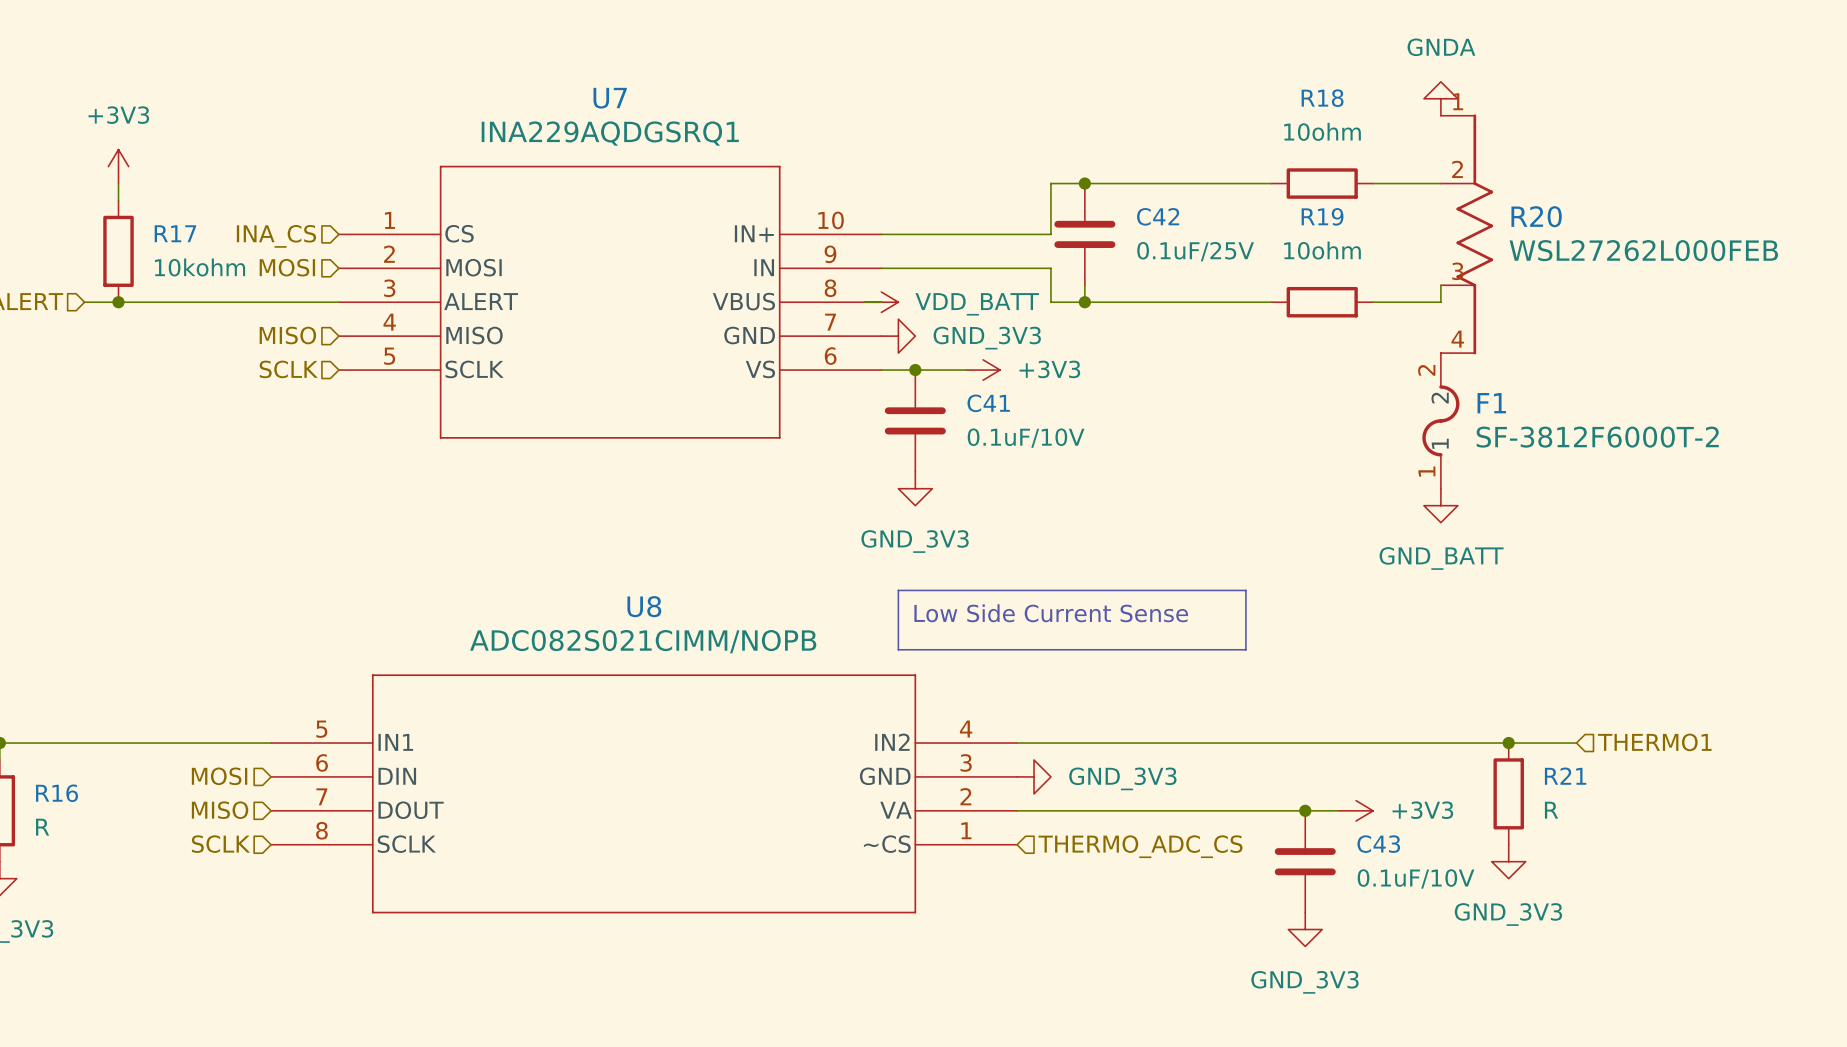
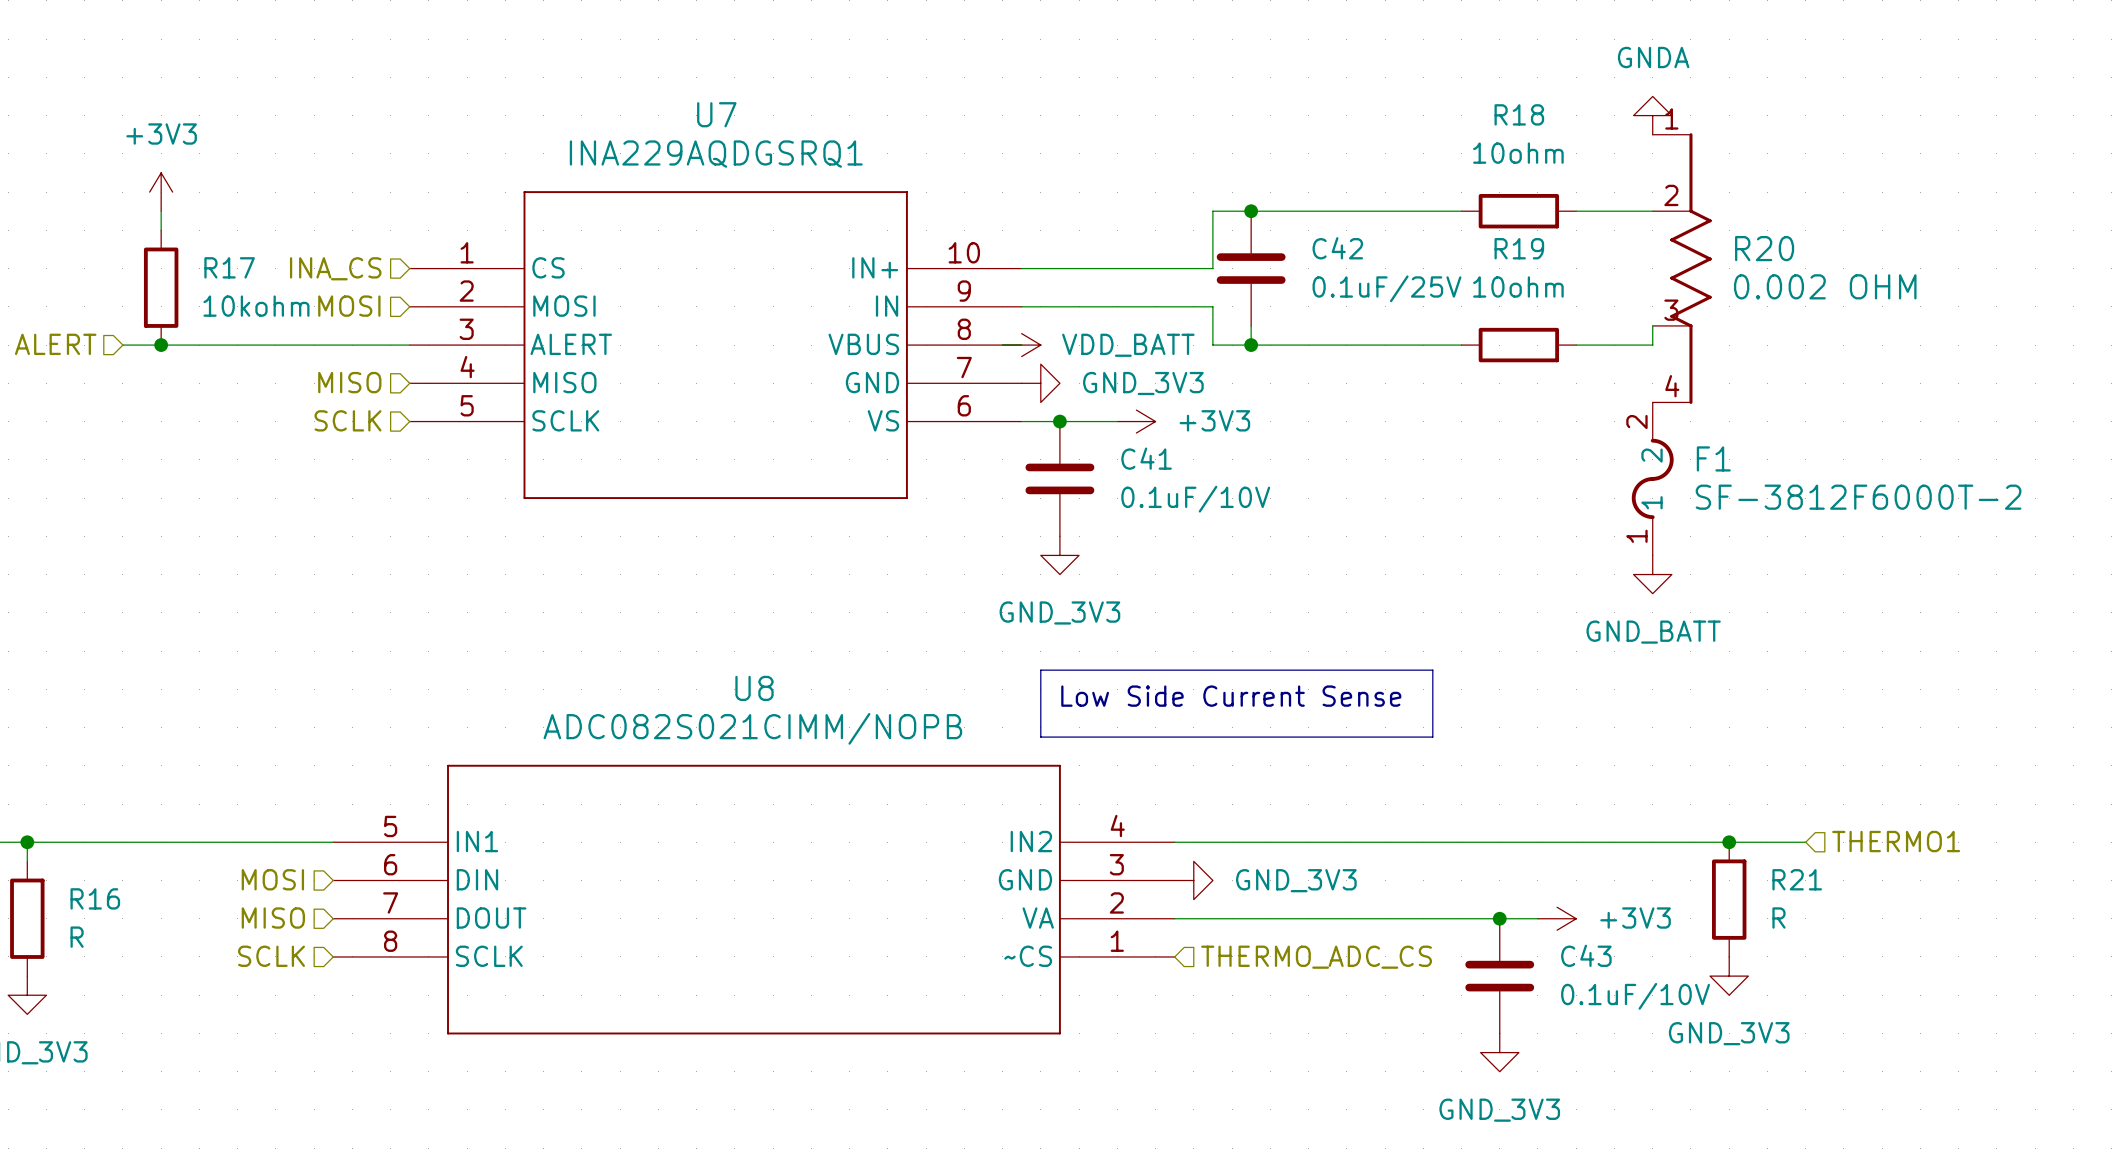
R20 value: WSL27262L000FEB (1643, 250) -> 0.002 OHM (1825, 286)

